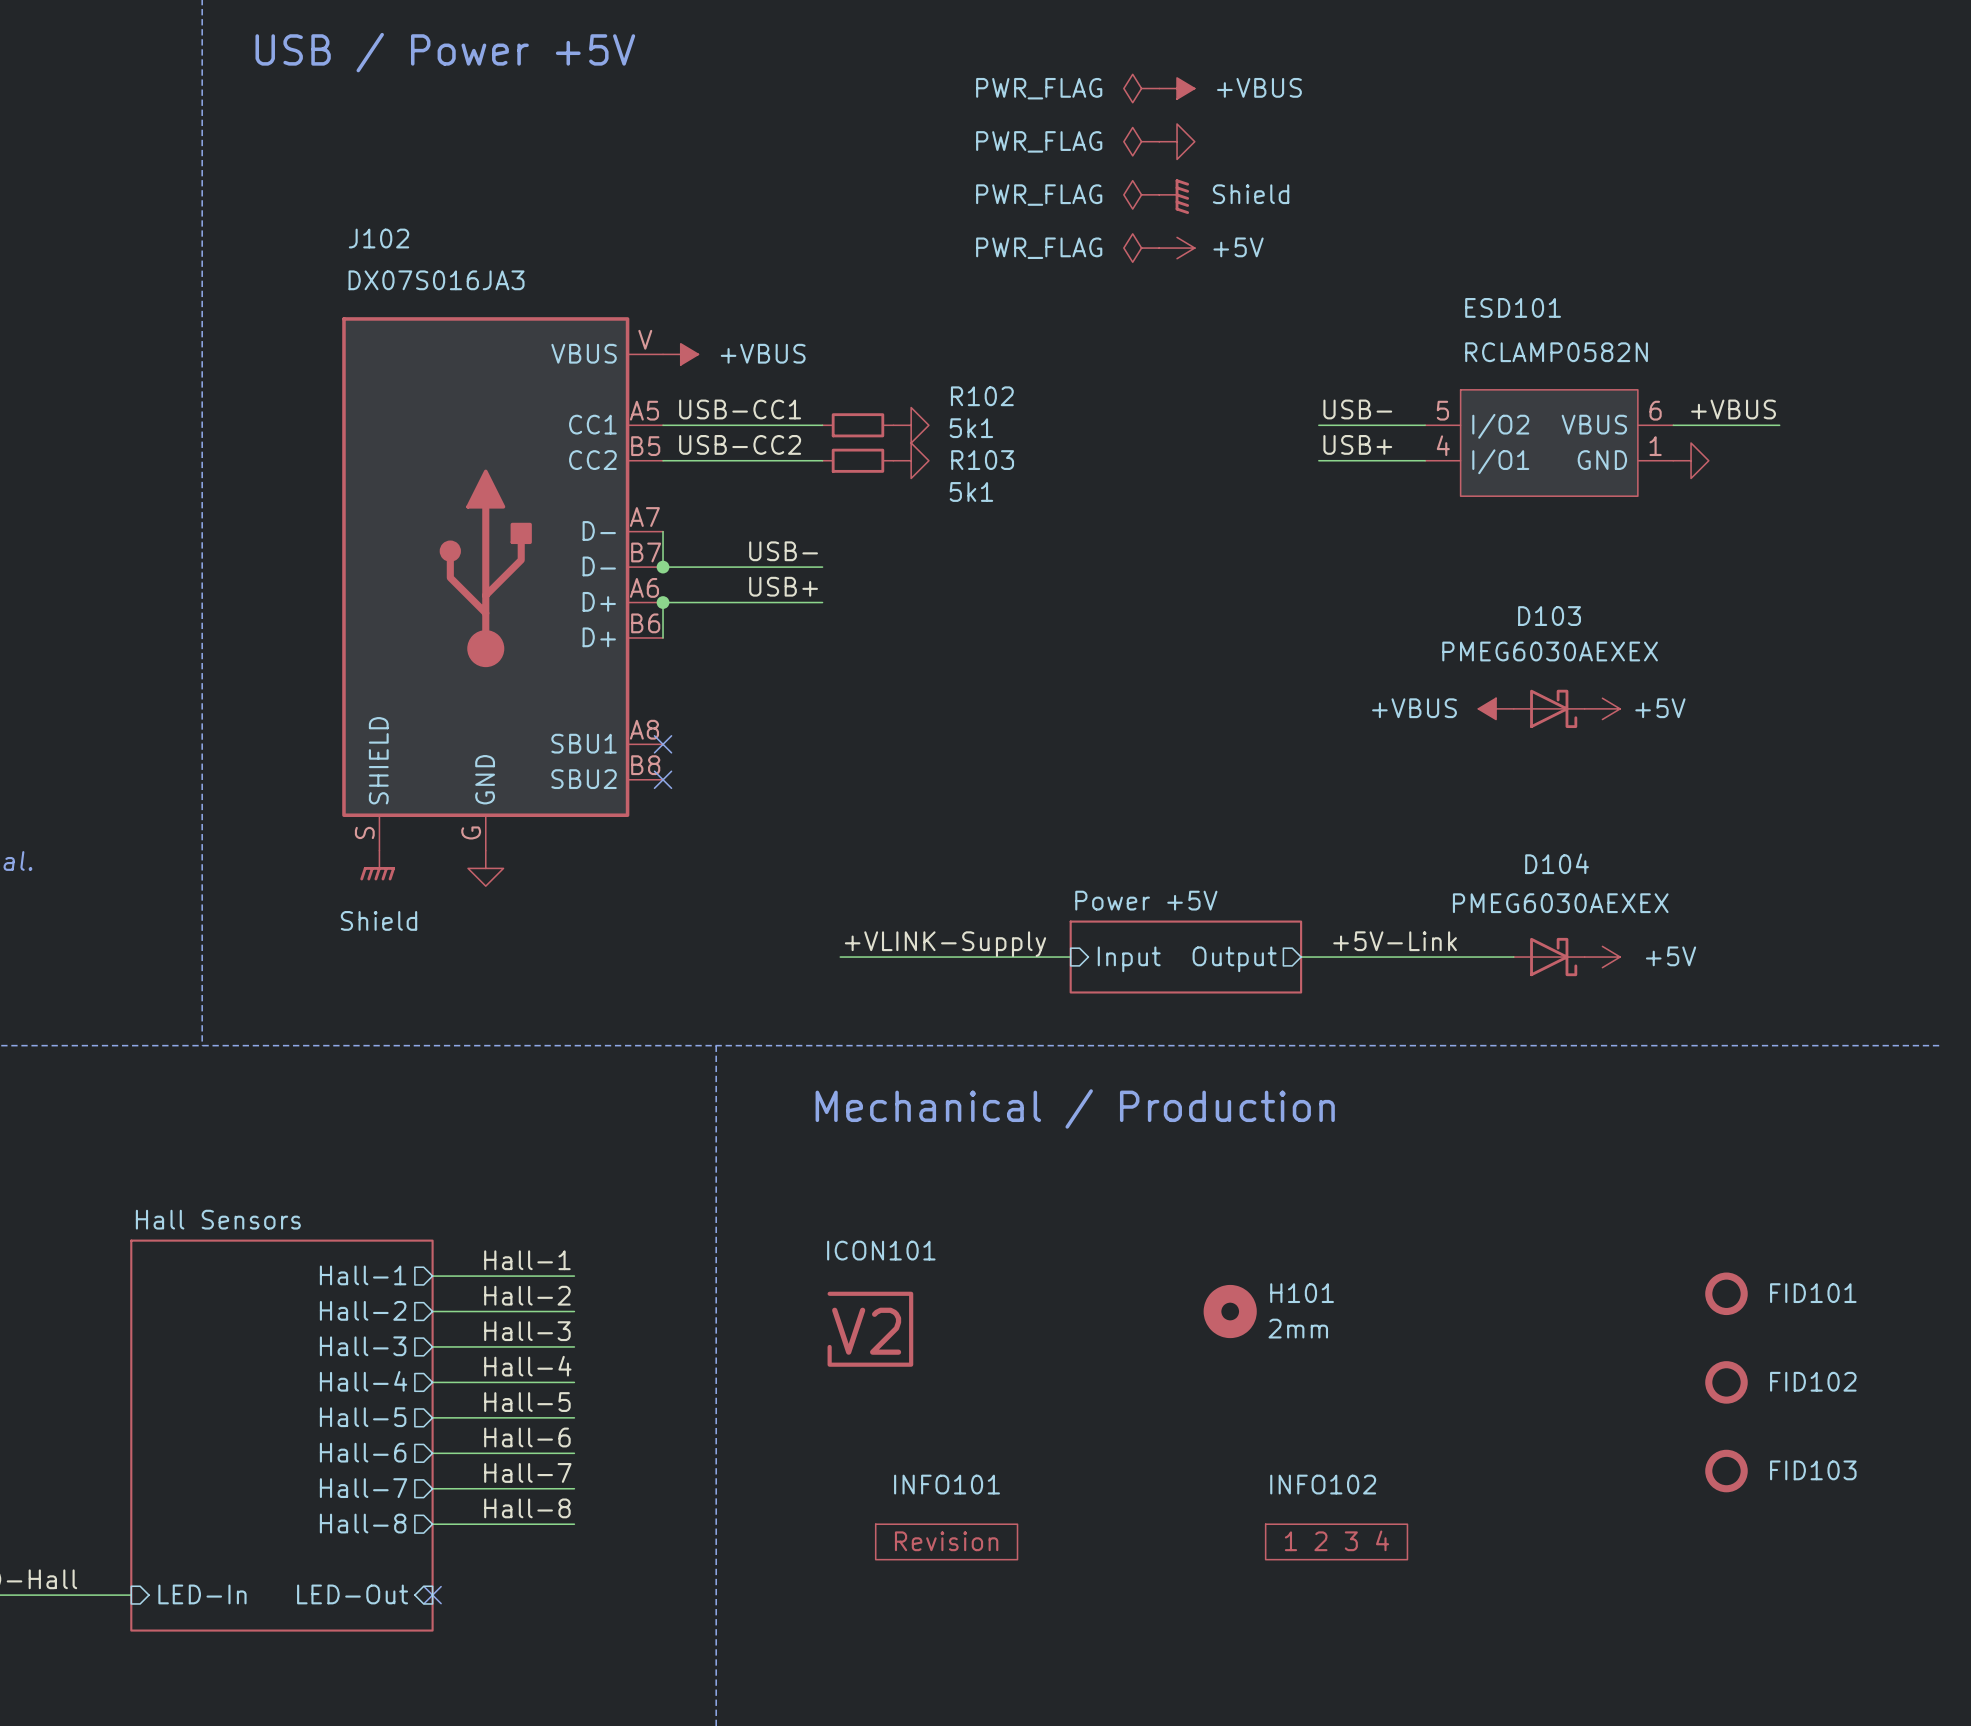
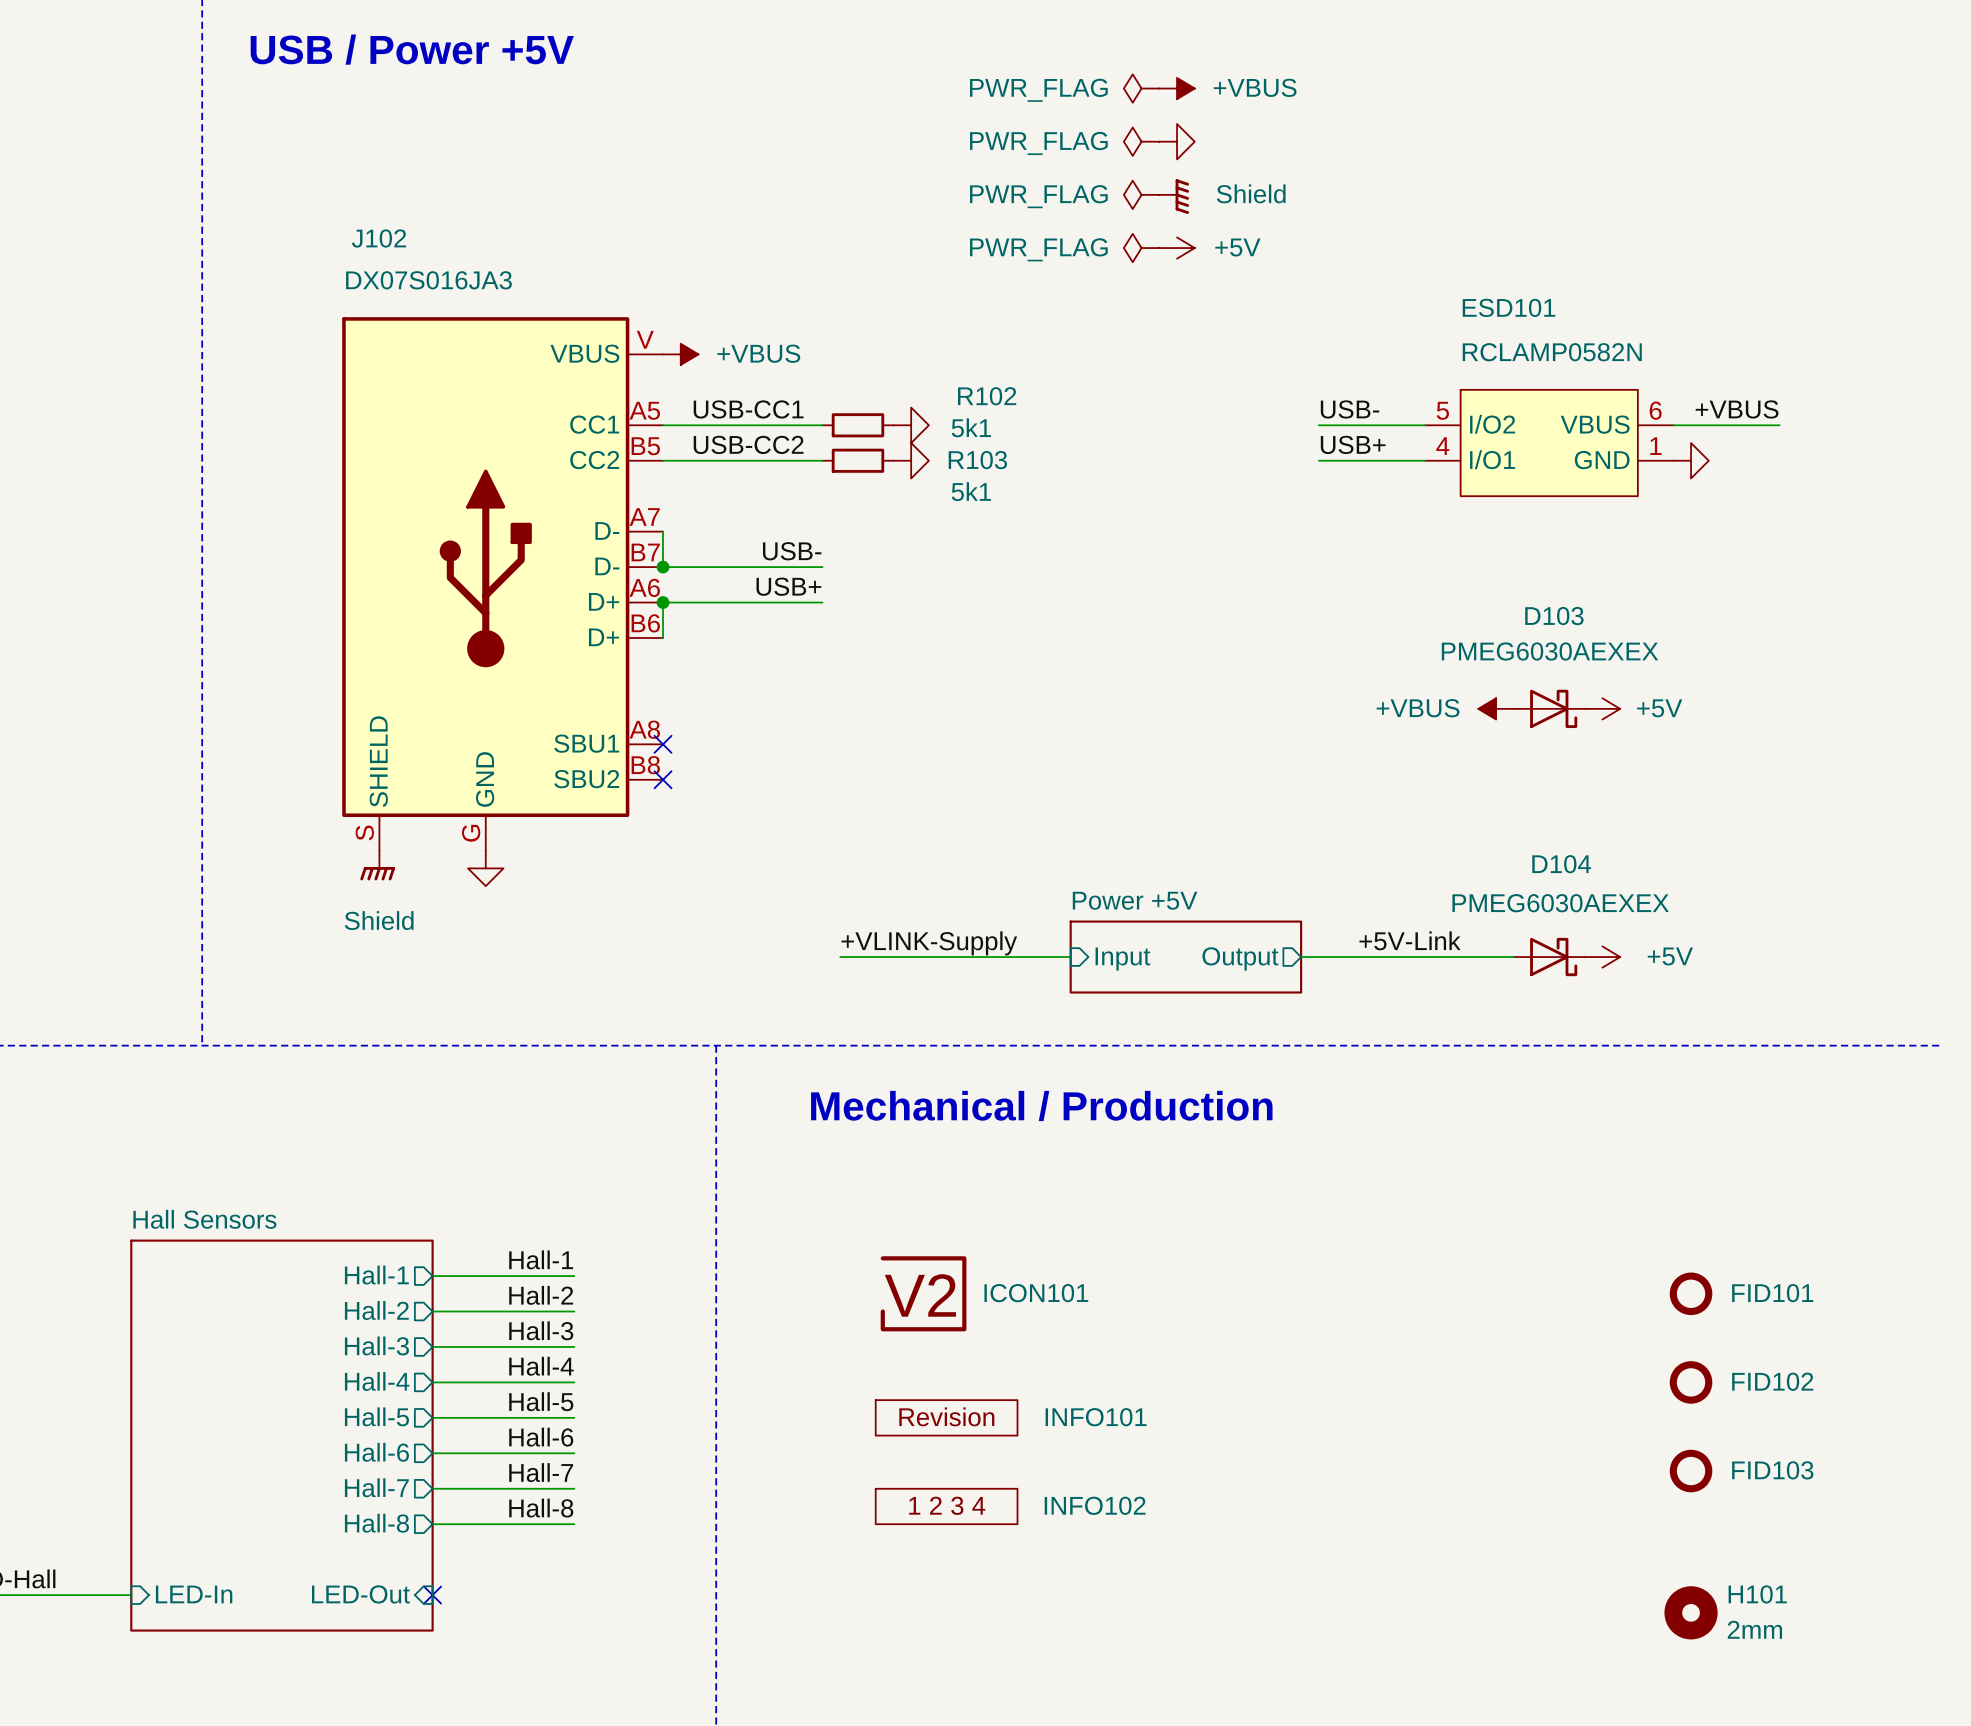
ICON101 name position: ICON101 (881, 1250) -> ICON101 (1036, 1293)
FID101 position: (1726, 1293) -> (1691, 1293)
H101 position: (1230, 1311) -> (1691, 1612)
ICON101 position: (870, 1329) -> (923, 1293)
FID102 position: (1726, 1382) -> (1691, 1382)
FID103 position: (1726, 1471) -> (1691, 1471)
INFO101 name position: INFO101 (947, 1484) -> INFO101 (1096, 1417)
INFO102 name position: INFO102 (1323, 1484) -> INFO102 (1095, 1505)
INFO101 position: (946, 1541) -> (946, 1417)
INFO102 position: (1336, 1541) -> (946, 1506)

